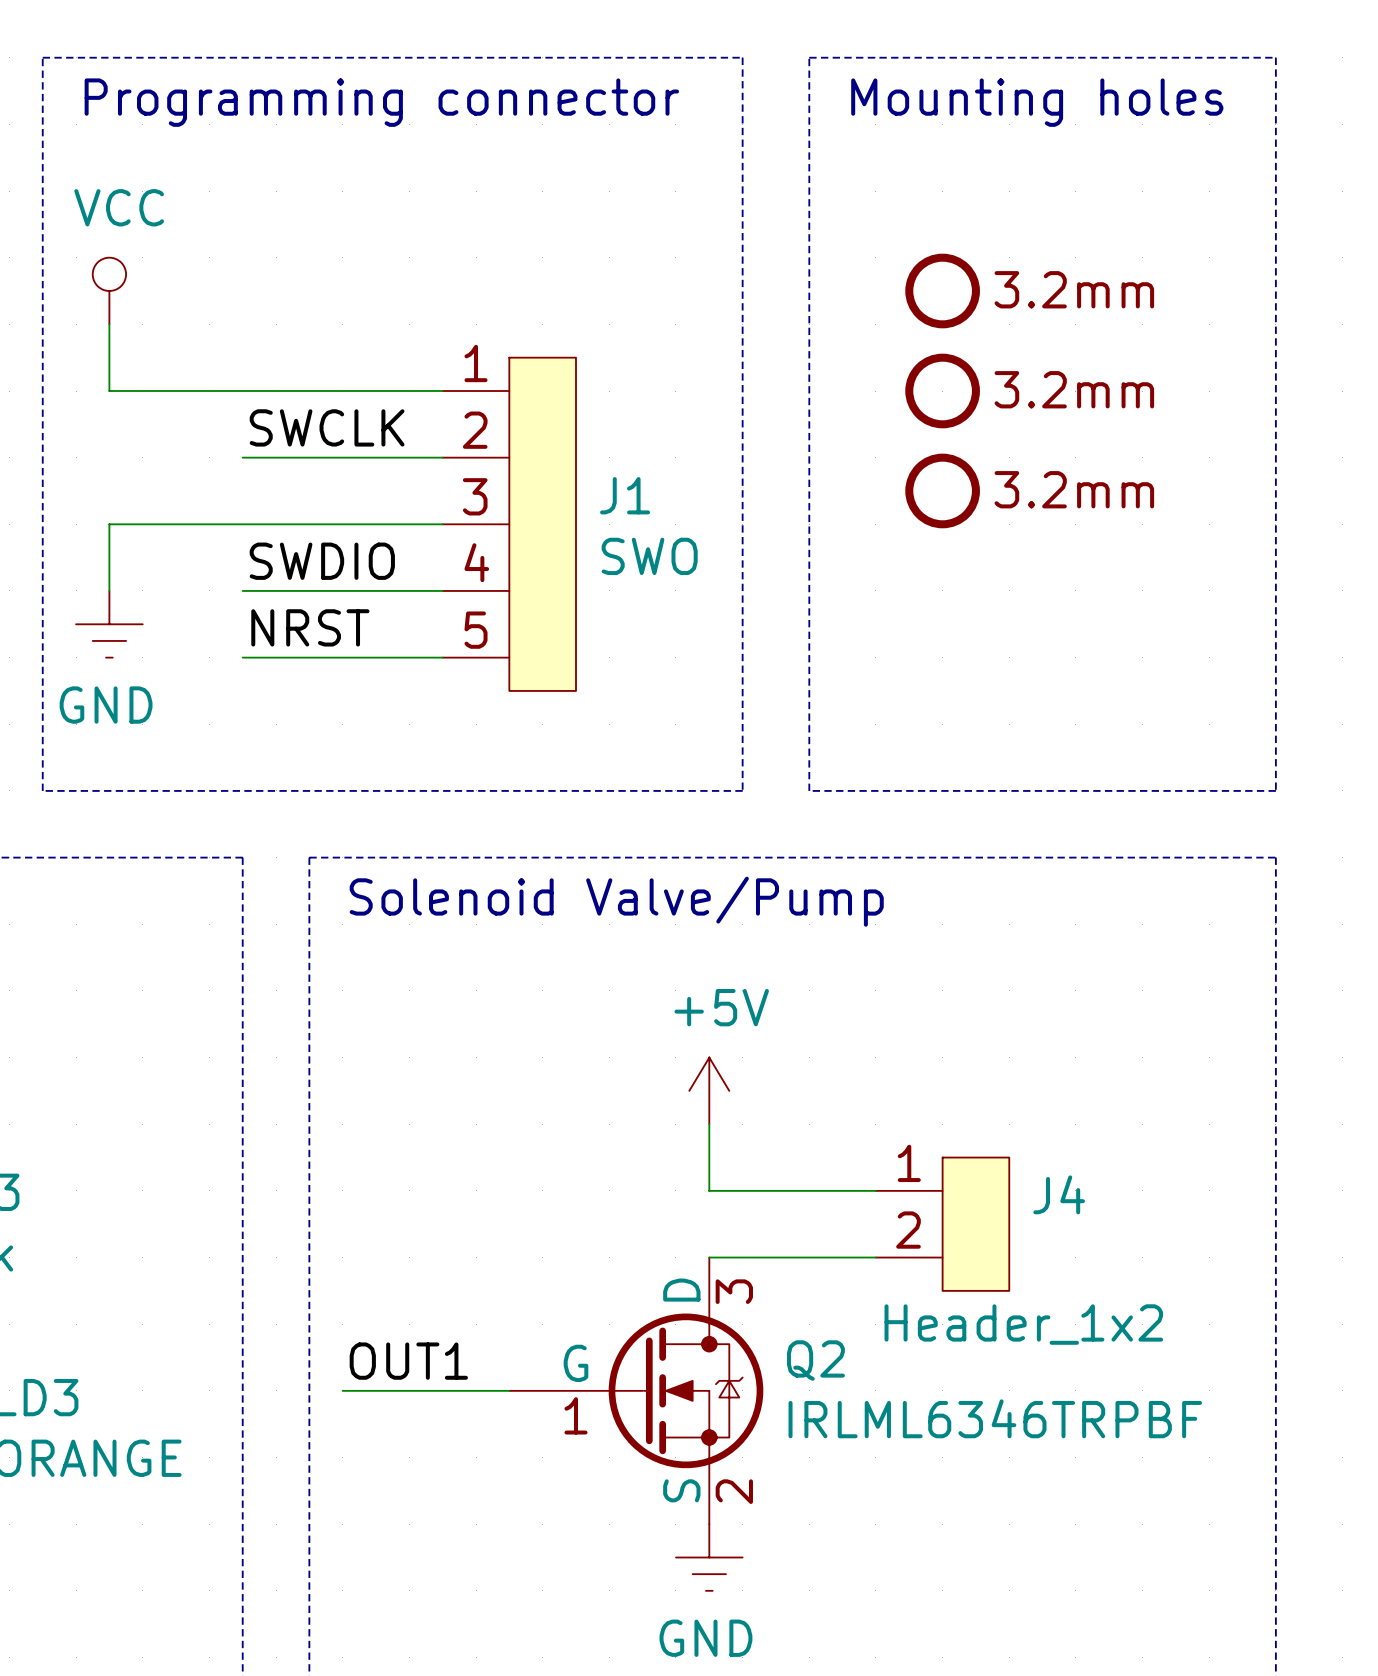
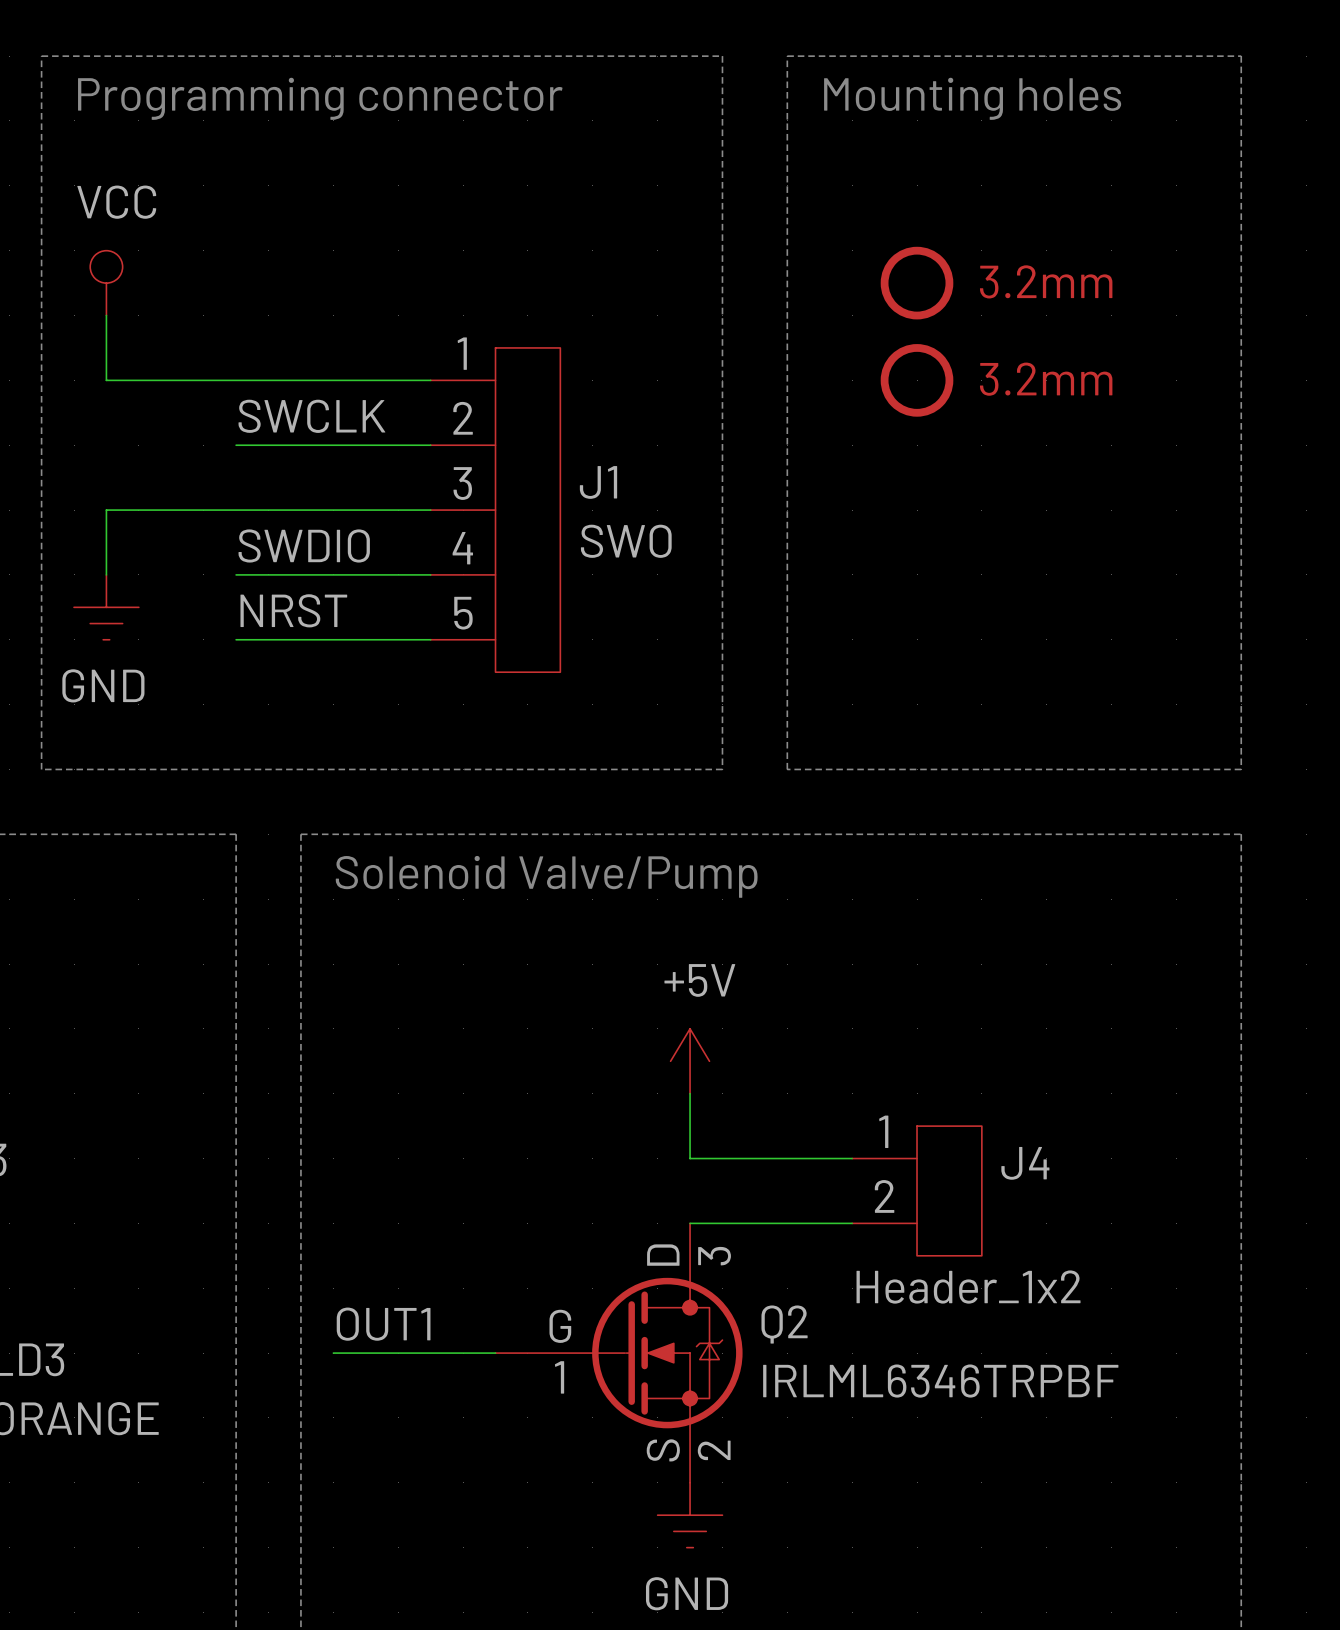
part: (942, 490) -> none

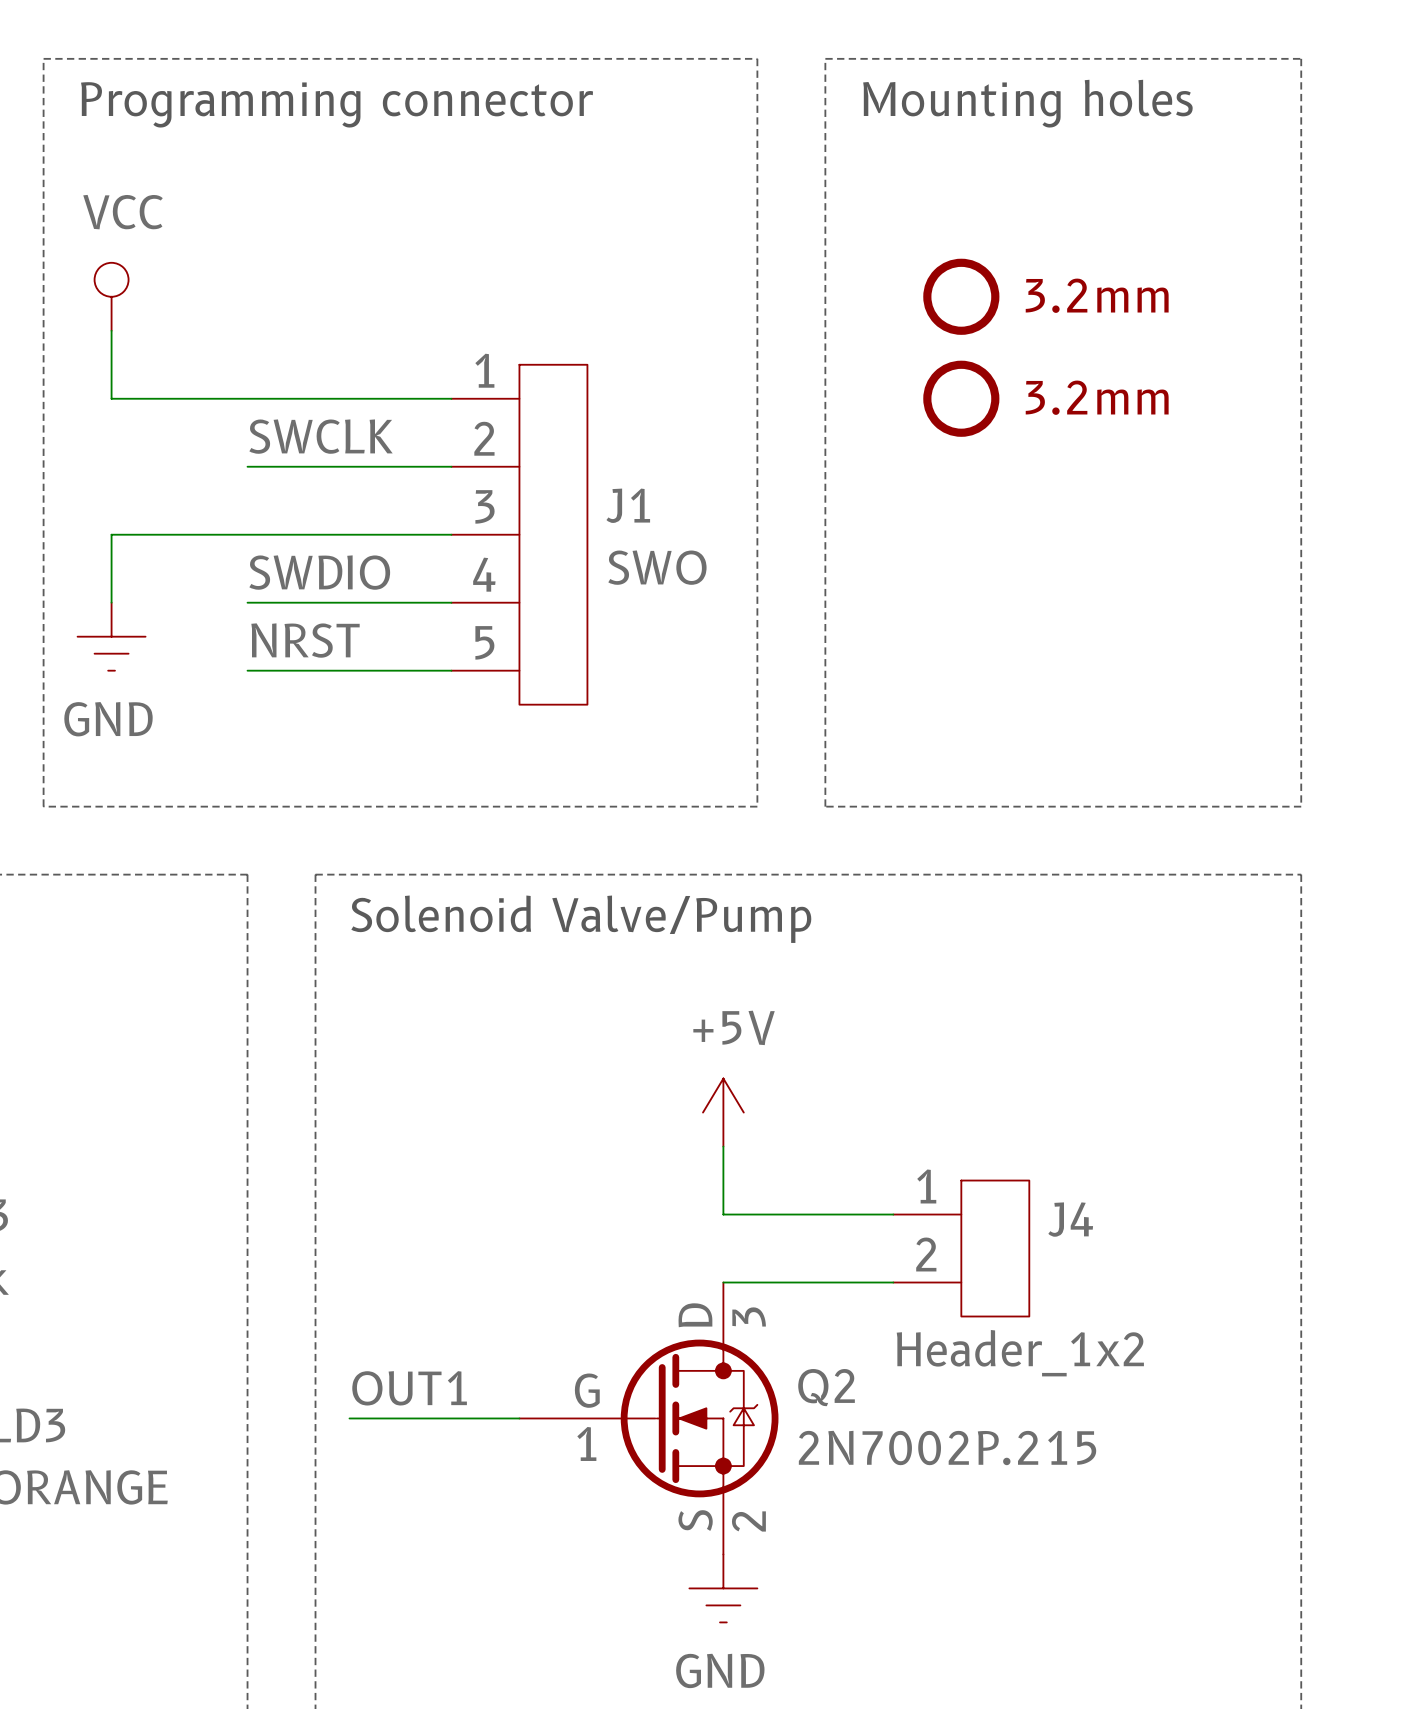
Q2 value: IRLML6346TRPBF (940, 1381) -> 2N7002P.215 (947, 1447)

